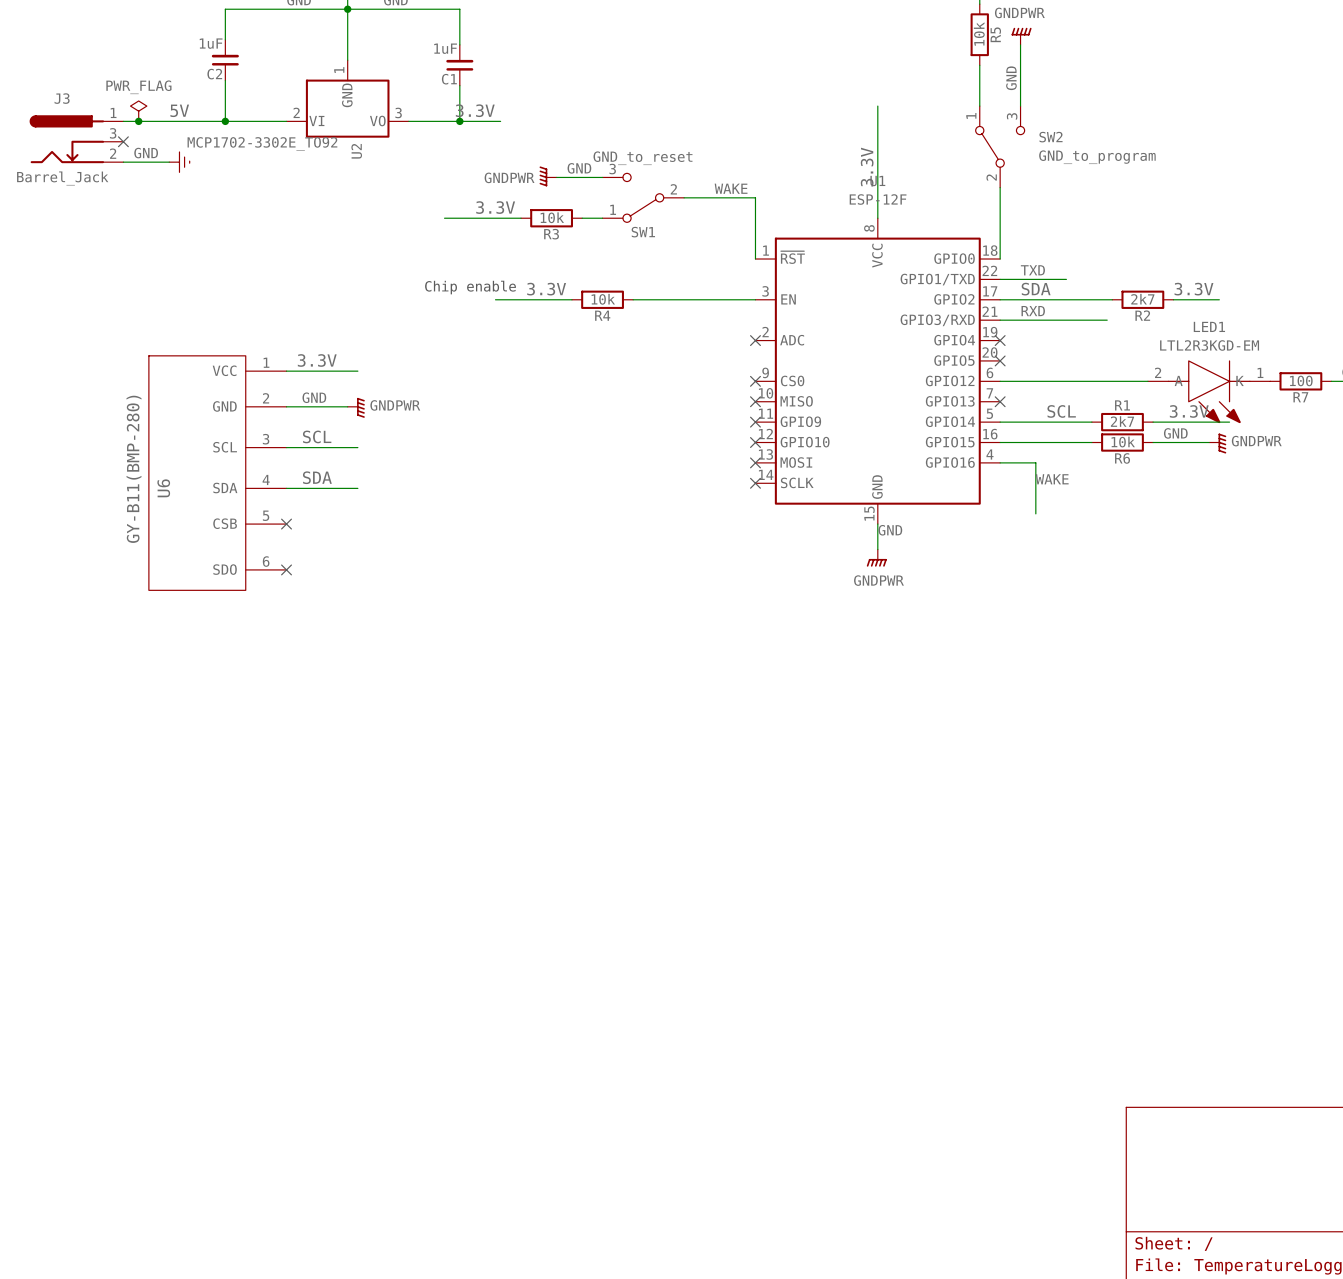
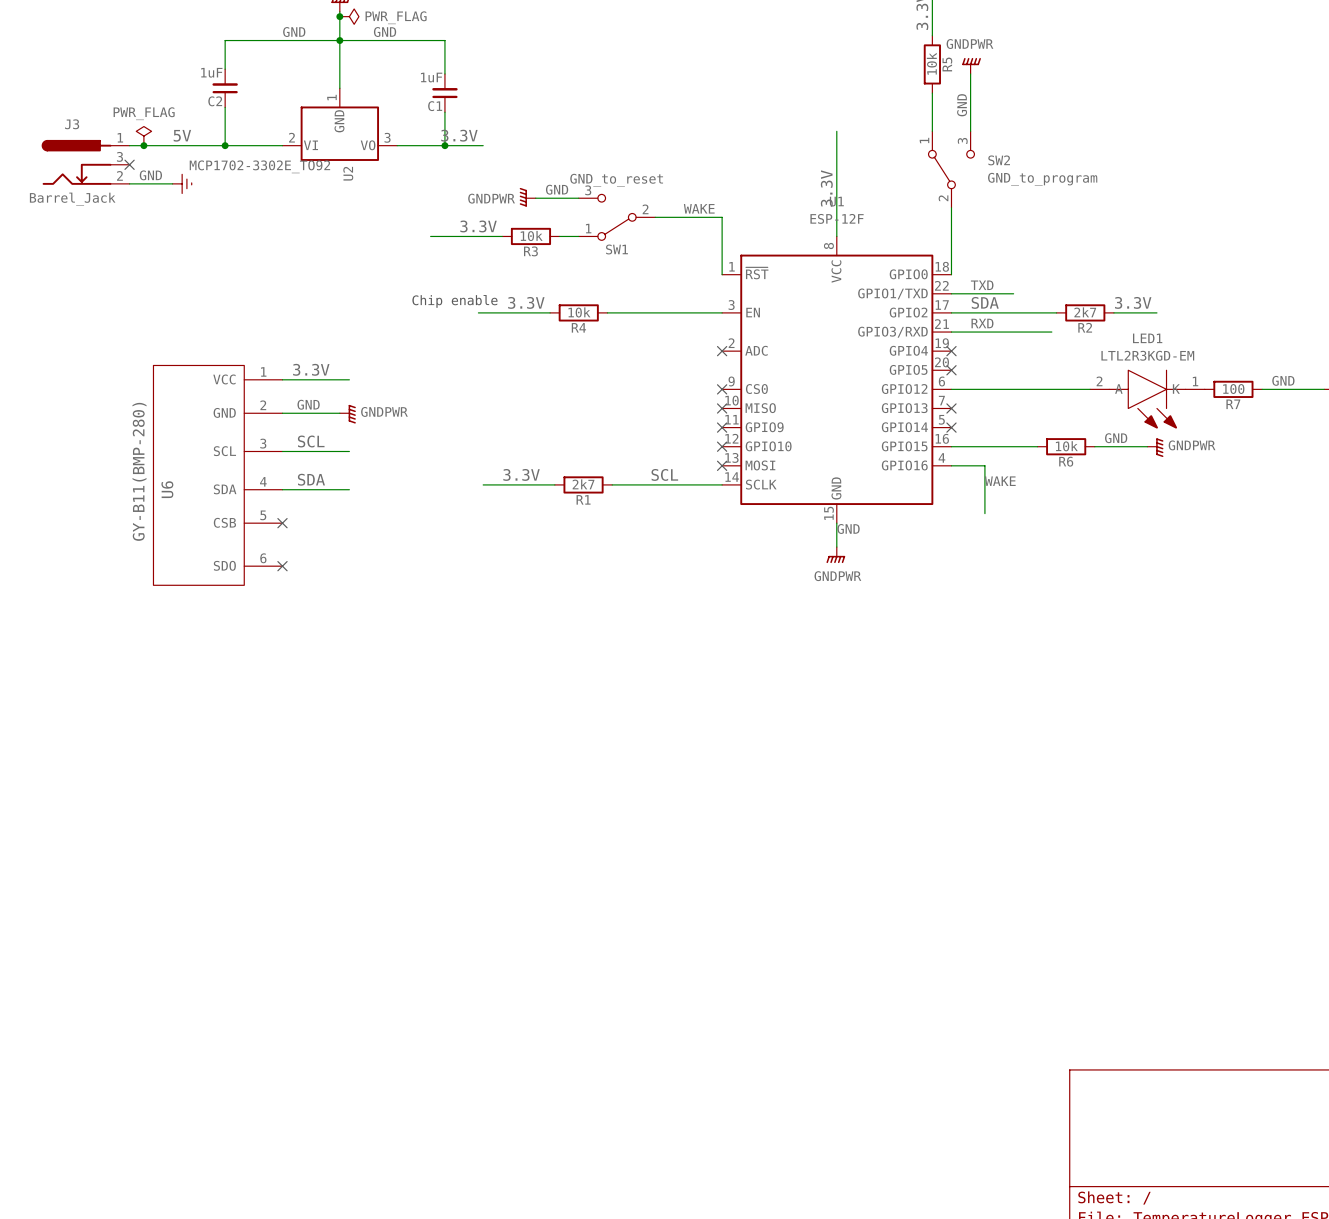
R1 name position: R1 (1122, 405) -> R1 (583, 499)
label: SCL (1061, 411) -> none
label: 3.3V (1189, 411) -> none
wire: (1000, 422) (1091, 422) -> none
no-connect mark: none -> (951, 427)
R1 position: (1122, 422) -> (583, 484)
wire: (1153, 422) (1229, 422) -> none
label: none -> 3.3V (521, 474)
label: none -> SCL (664, 474)
wire: none -> (483, 484) (554, 484)
wire: none -> (612, 484) (722, 484)
no-connect mark: (755, 483) -> none

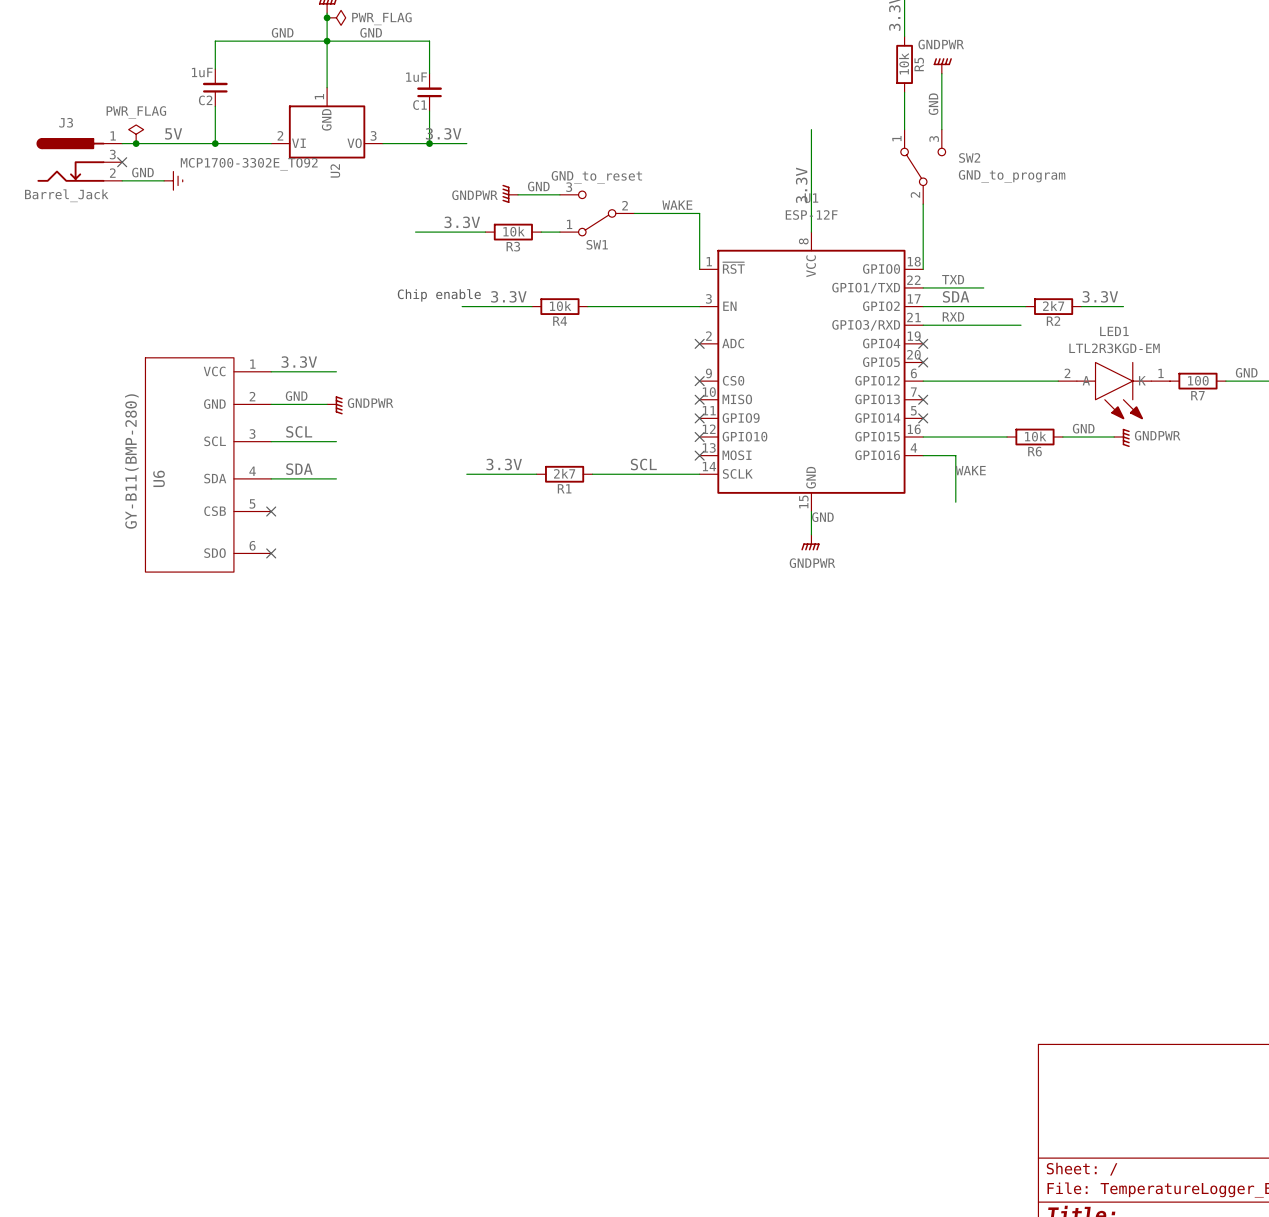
U2 value: MCP1702-3302E_TO92 (259, 166) -> MCP1700-3302E_TO92 (249, 164)

